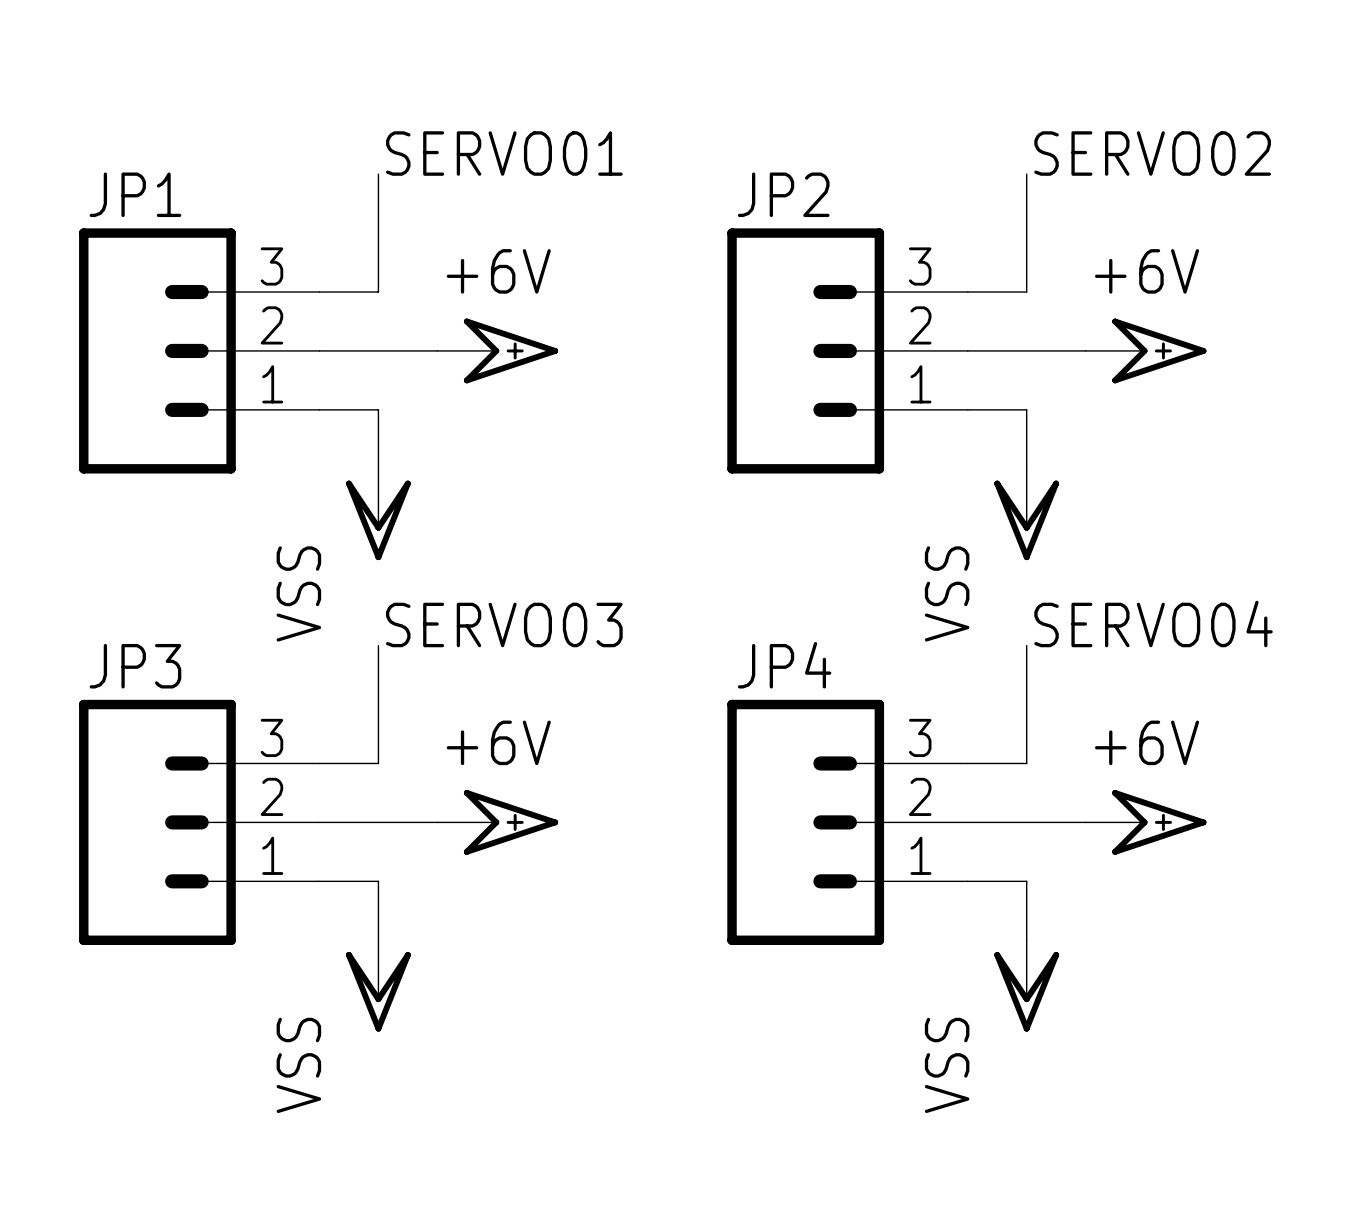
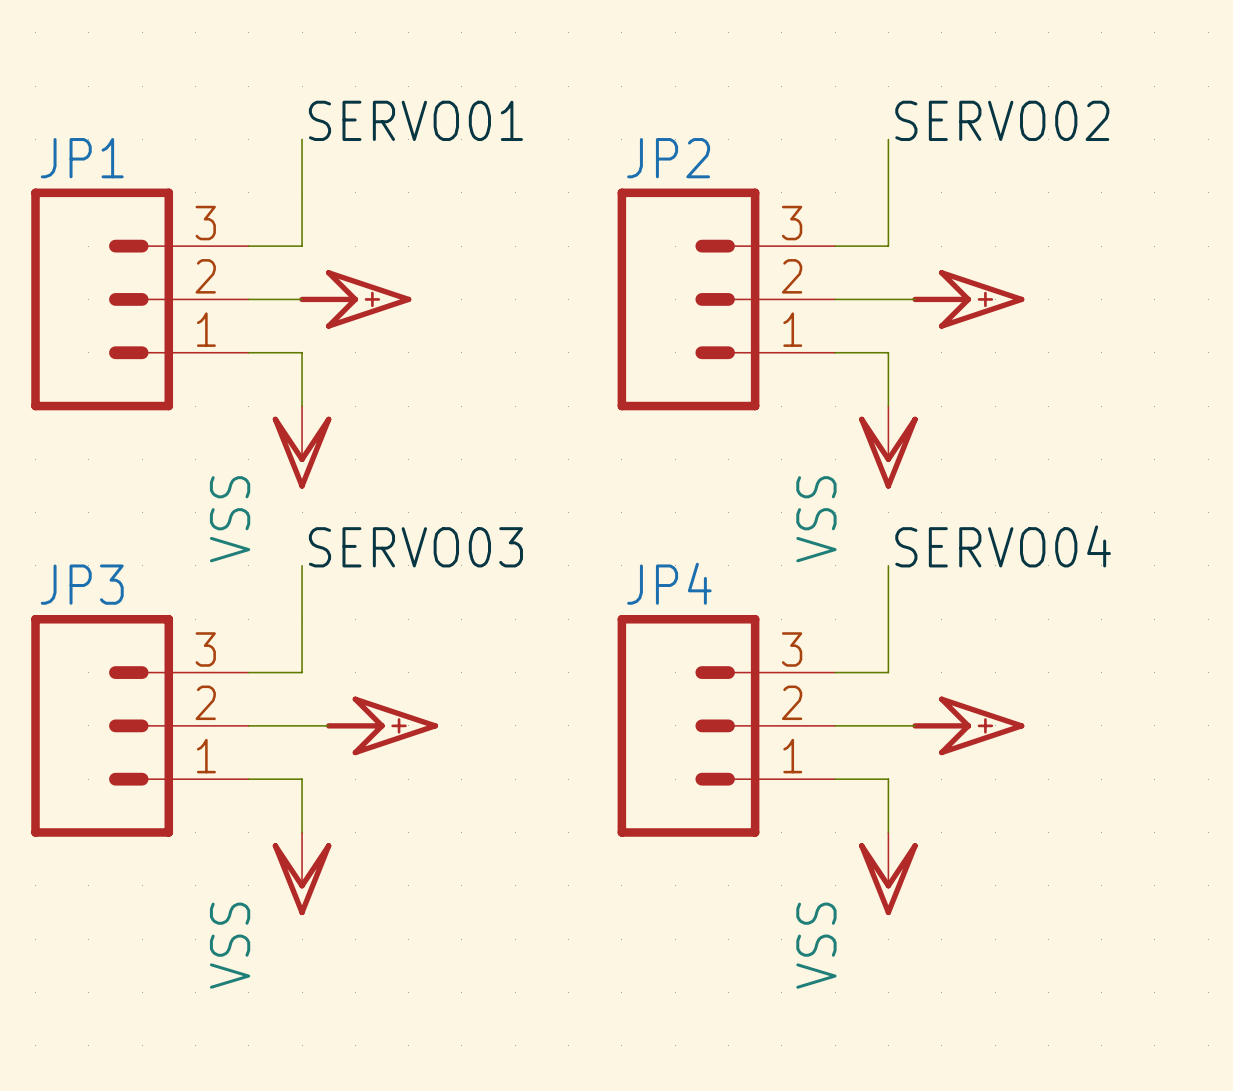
power symbol: none -> (355, 299)
power symbol: +6V (497, 350) -> none
power symbol: none -> (968, 299)
power symbol: +6V (1146, 350) -> none
power symbol: none -> (381, 725)
power symbol: +6V (497, 822) -> none
power symbol: none -> (968, 725)
power symbol: +6V (1146, 822) -> none

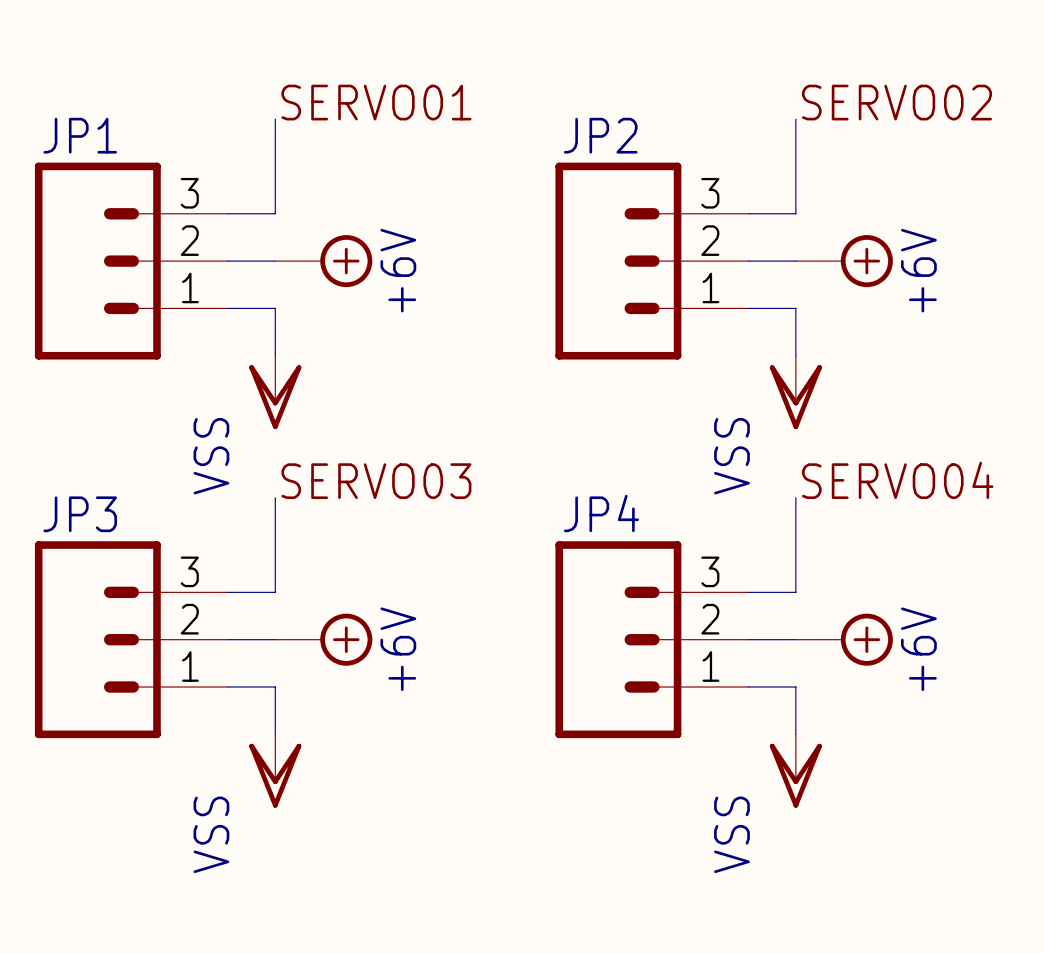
power symbol shape: [299, 270, 412, 329] -> [275, 235, 373, 288]
power symbol: none -> +6V (844, 261)
power symbol: (968, 299) -> none
power symbol text: none -> +6V (398, 270)
power symbol: none -> +6V (323, 639)
power symbol: (381, 725) -> none
power symbol: none -> +6V (844, 639)
power symbol: (968, 725) -> none

